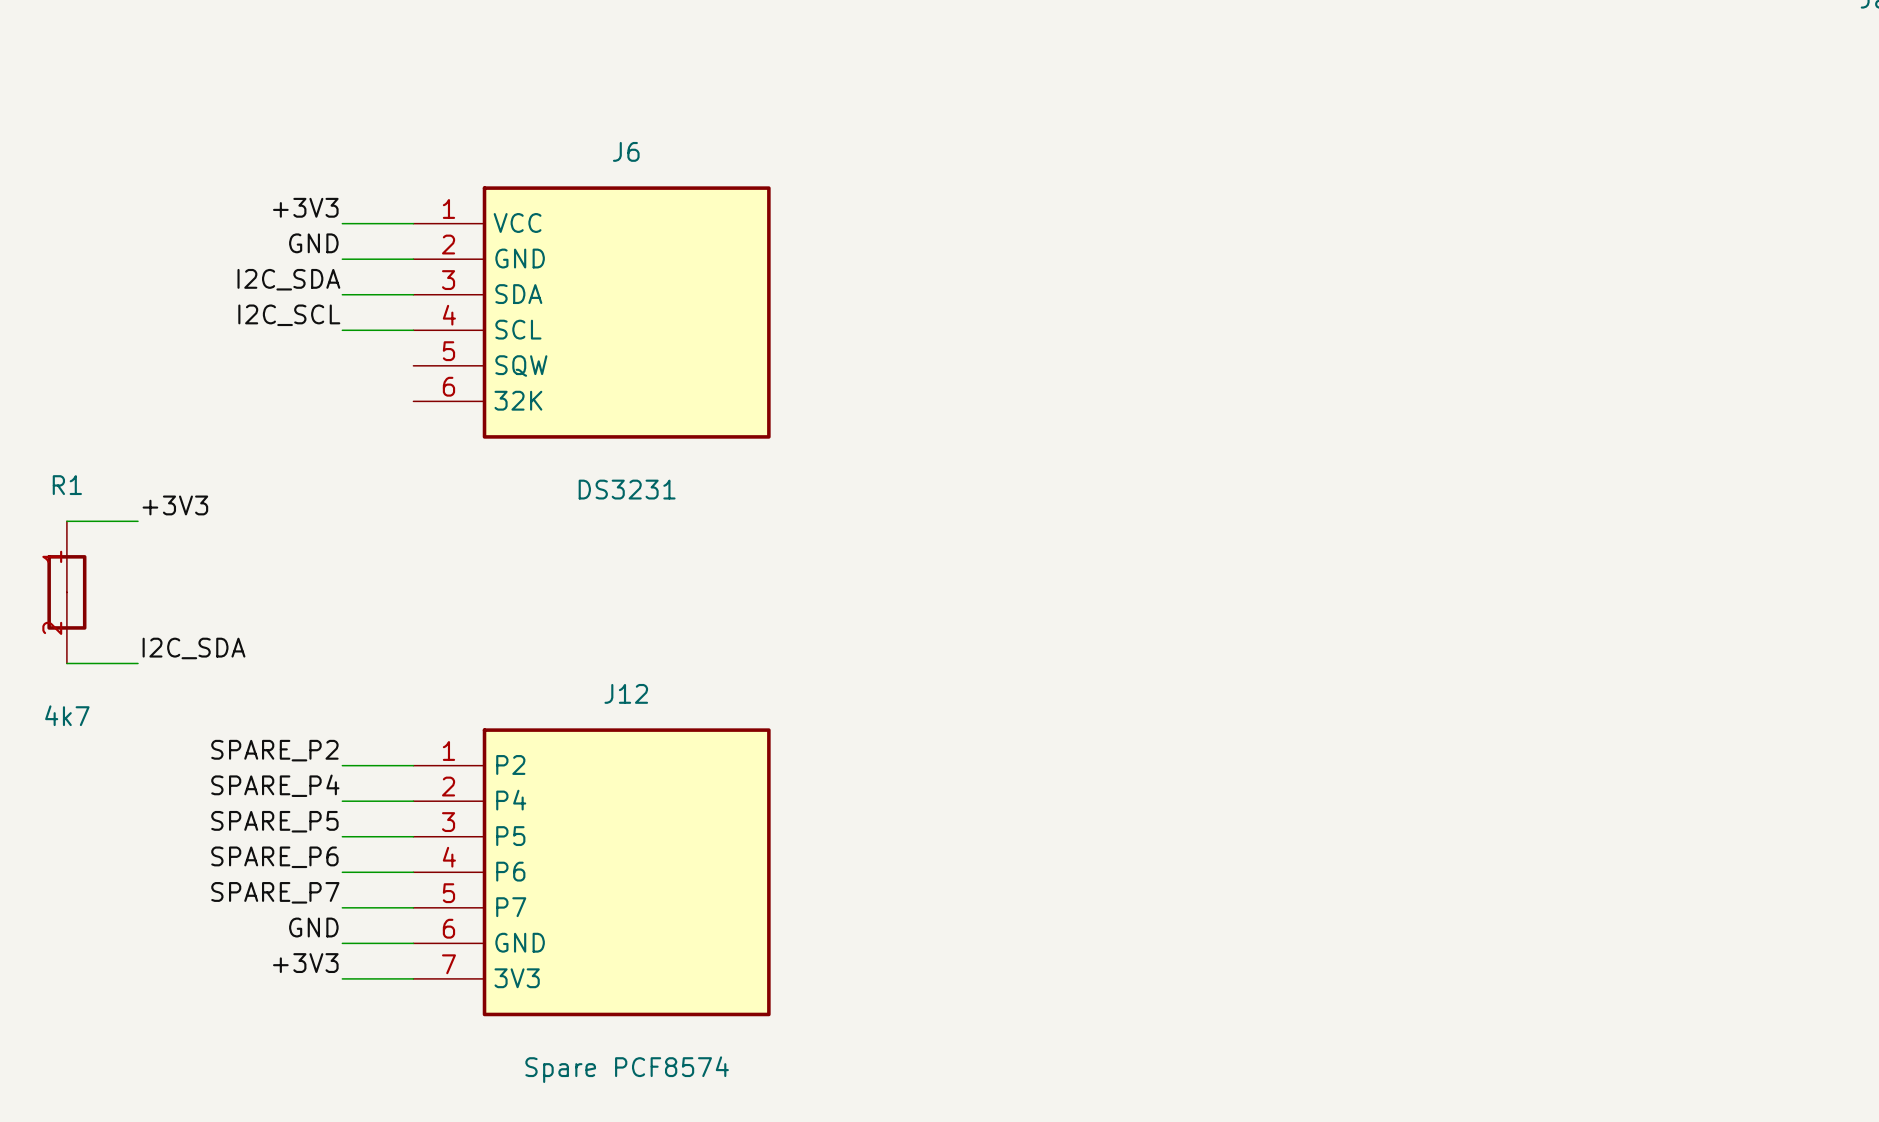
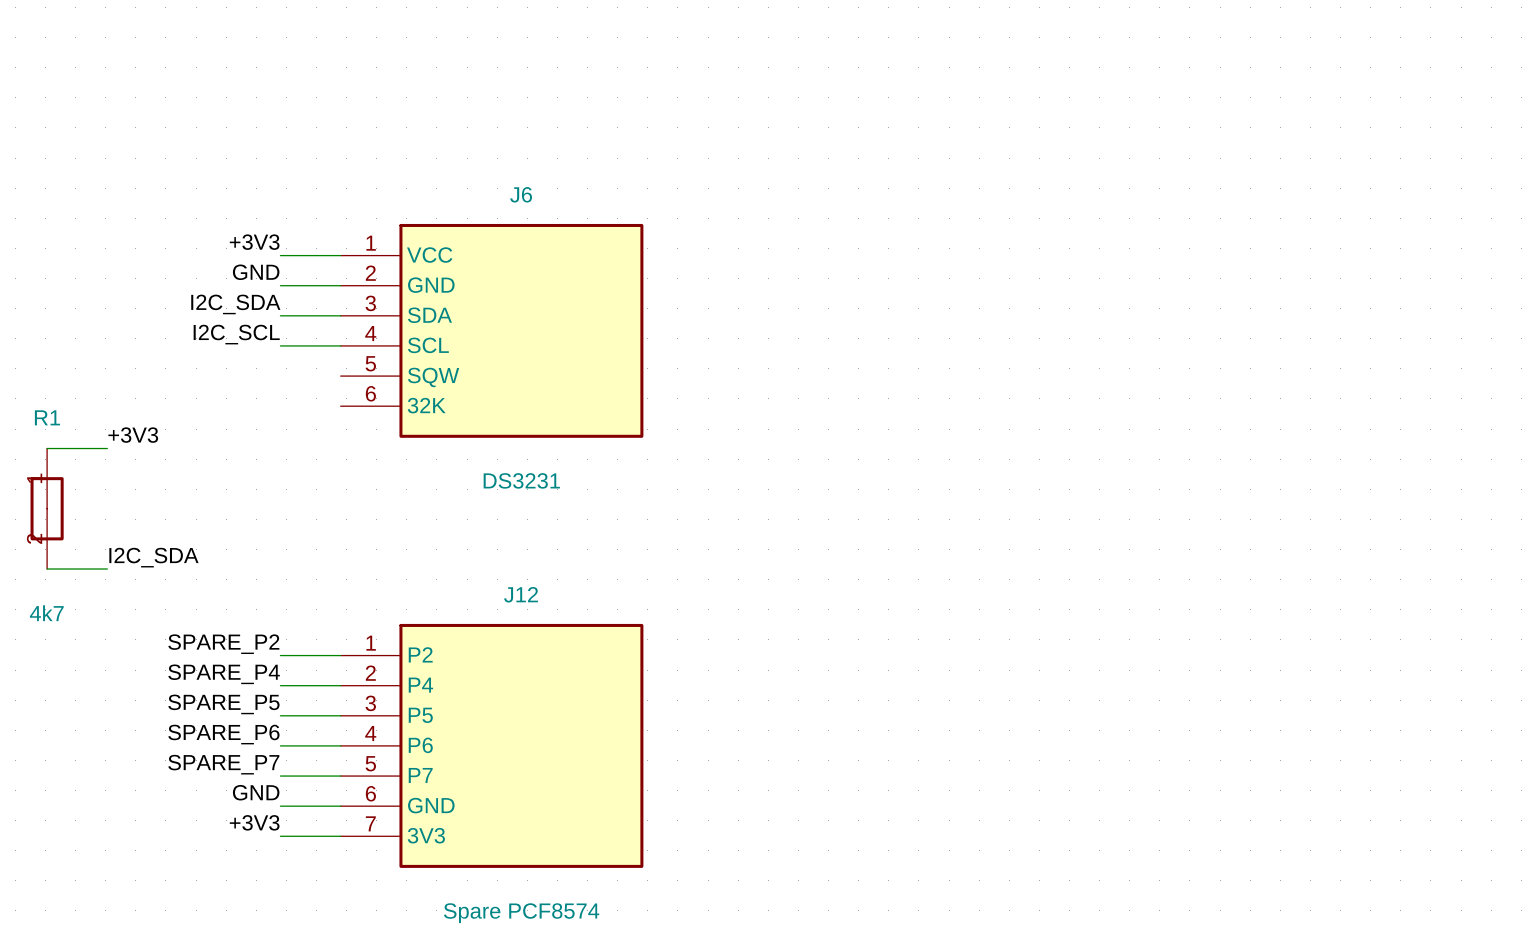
label: +3V3 (305, 207) -> none
wire: (342, 223) (413, 223) -> (280, 255) (340, 255)
label: GND (313, 243) -> none
wire: (342, 259) (413, 259) -> (280, 285) (340, 285)
label: I2C_SDA (288, 279) -> +3V3 (254, 242)
wire: (342, 294) (413, 294) -> (280, 315) (340, 315)
J6 position: (592, 312) -> (492, 330)
label: I2C_SCL (289, 315) -> GND (256, 272)
wire: (342, 330) (413, 330) -> (280, 345) (340, 345)
label: none -> I2C_SDA (235, 304)
label: none -> I2C_SCL (236, 334)

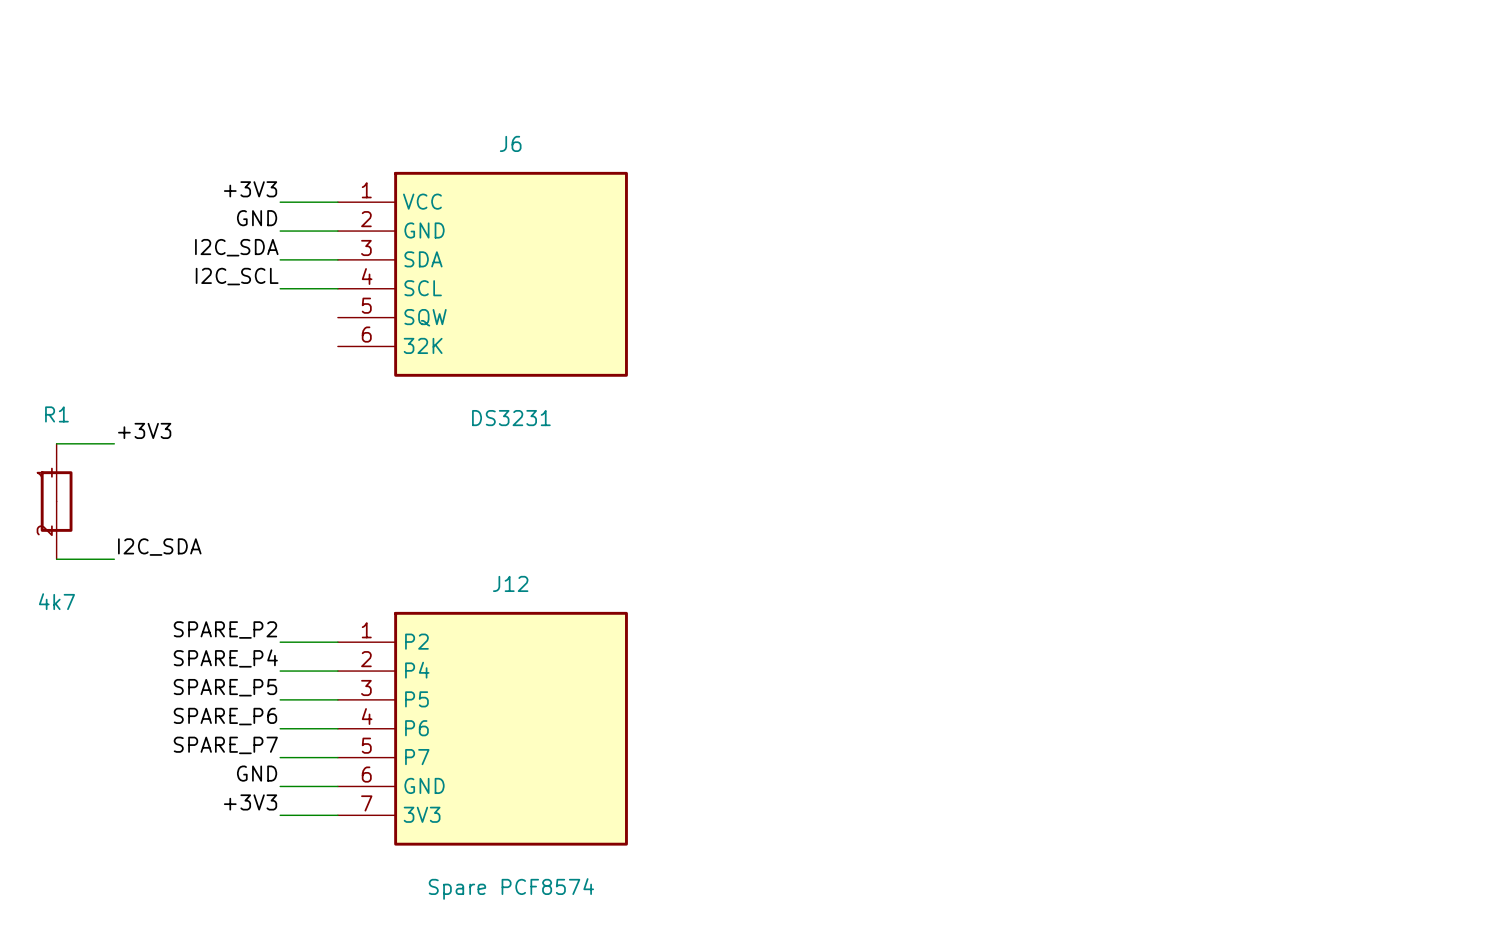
label: none -> +3V3 (250, 189)
label: none -> GND (257, 218)
label: +3V3 (254, 242) -> I2C_SDA (236, 247)
wire: (280, 255) (340, 255) -> (280, 202) (337, 202)
label: GND (256, 272) -> I2C_SCL (237, 276)
wire: (280, 285) (340, 285) -> (280, 231) (337, 231)
label: I2C_SDA (235, 304) -> none
wire: (280, 315) (340, 315) -> (280, 259) (337, 259)
J6 position: (492, 330) -> (482, 274)
label: I2C_SCL (236, 334) -> none
wire: (280, 345) (340, 345) -> (280, 288) (337, 288)

